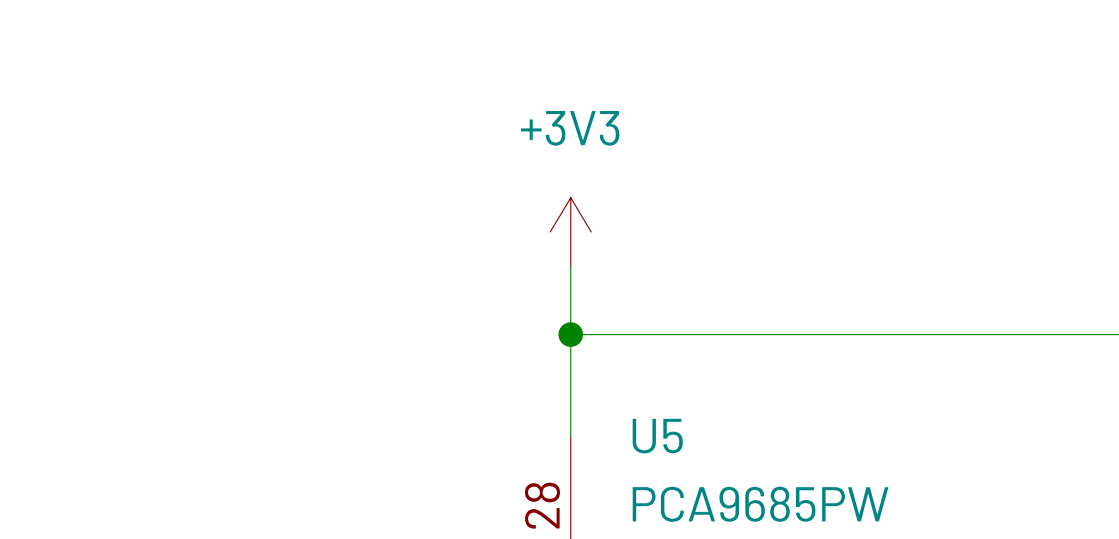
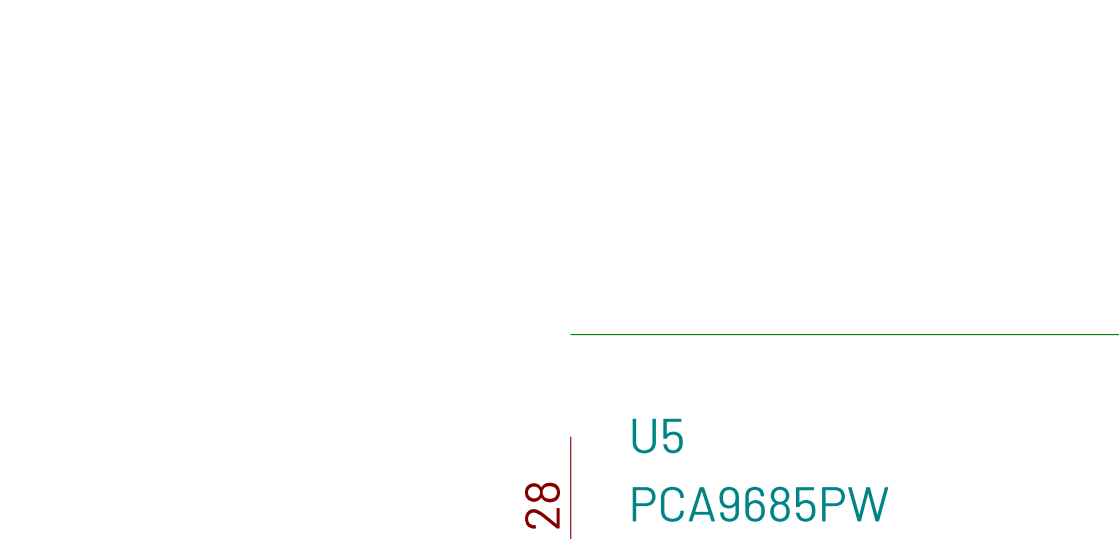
power symbol: +3V3 (570, 231) -> none
wire: (570, 266) (570, 437) -> none
junction: (570, 334) -> none

